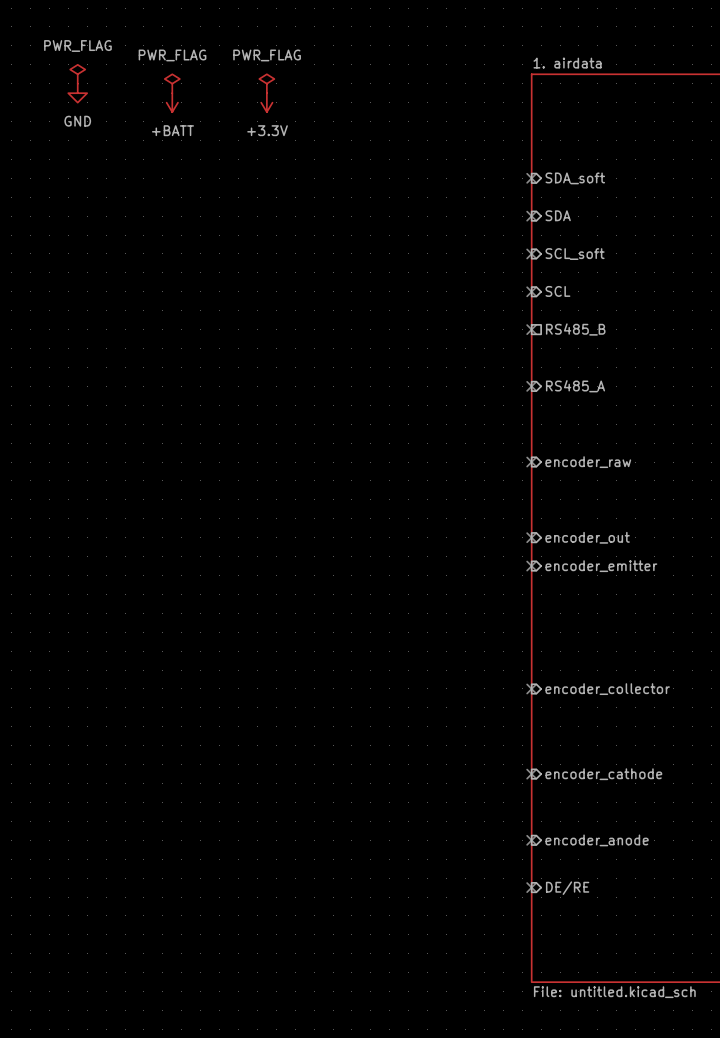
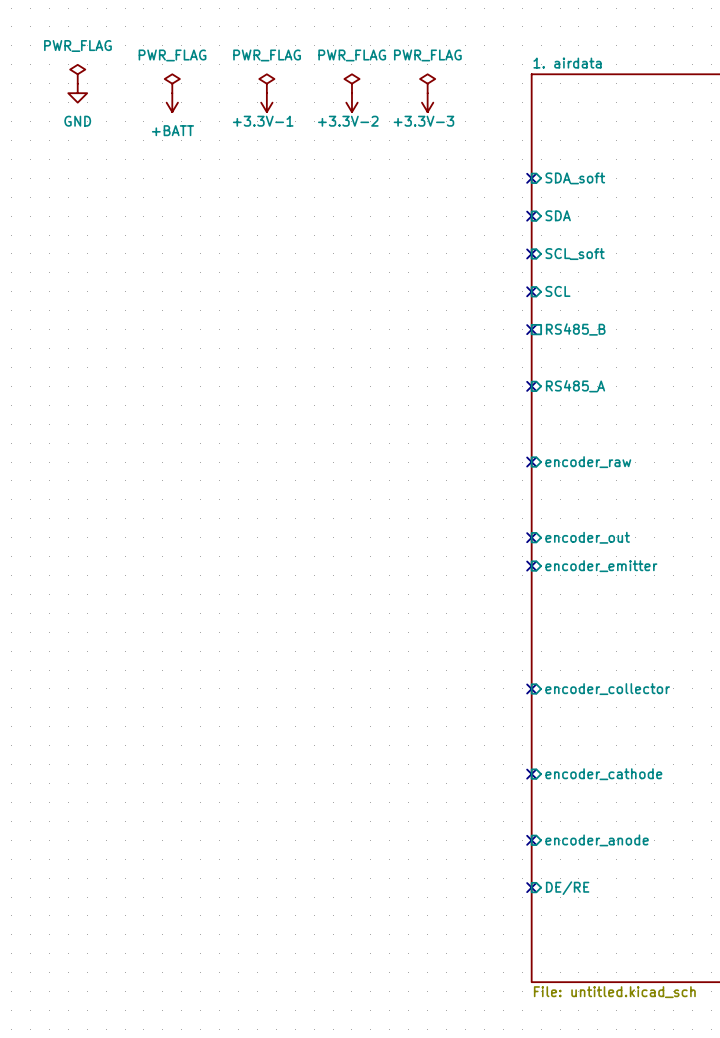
power symbol: none -> PWR_FLAG (351, 83)
power symbol: none -> PWR_FLAG (427, 83)
power symbol: +3.3V (266, 102) -> +3.3V-1 (266, 102)
power symbol: none -> +3.3V-2 (351, 102)
power symbol: none -> +3.3V-3 (427, 102)

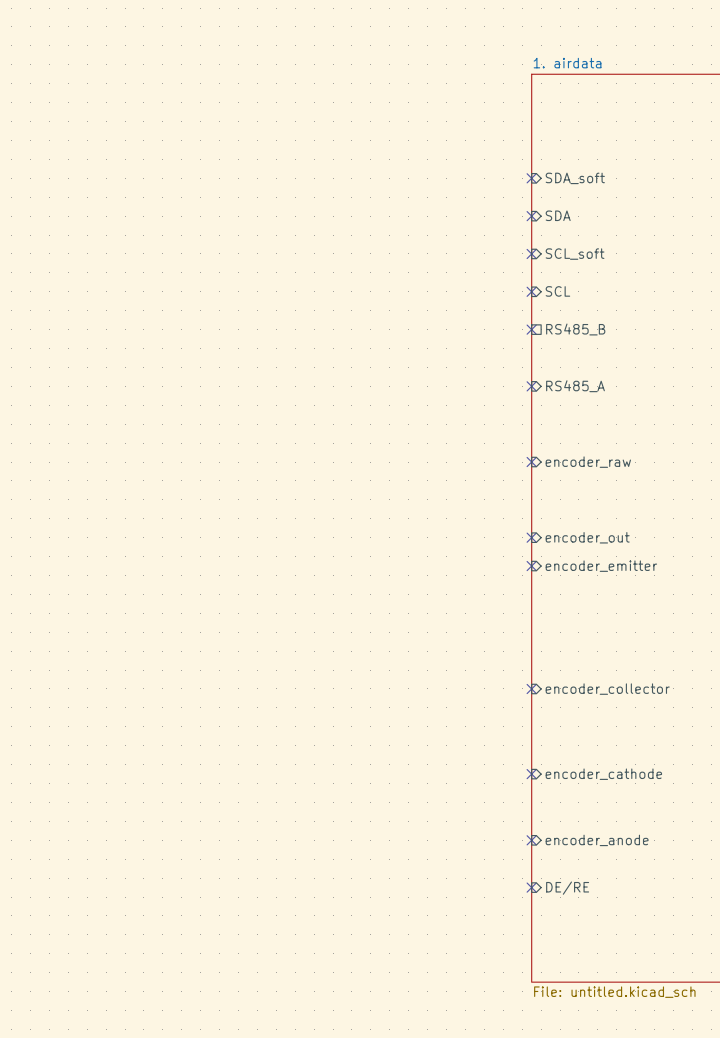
power symbol: PWR_FLAG (77, 74) -> none
power symbol: PWR_FLAG (172, 83) -> none
power symbol: PWR_FLAG (266, 83) -> none
power symbol: PWR_FLAG (351, 83) -> none
power symbol: PWR_FLAG (427, 83) -> none
power symbol: GND (77, 93) -> none
power symbol: +BATT (172, 102) -> none
power symbol: +3.3V-1 (266, 102) -> none
power symbol: +3.3V-2 (351, 102) -> none
power symbol: +3.3V-3 (427, 102) -> none

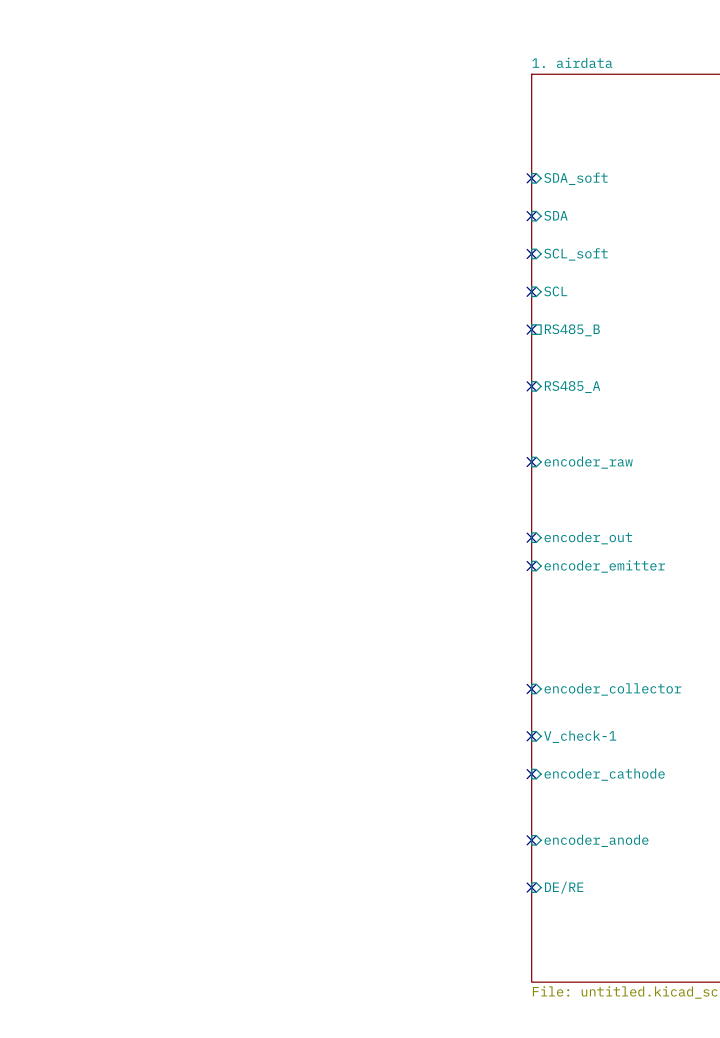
no-connect mark: none -> (531, 736)
sheet pin: none -> V_check-1 (580, 736)

